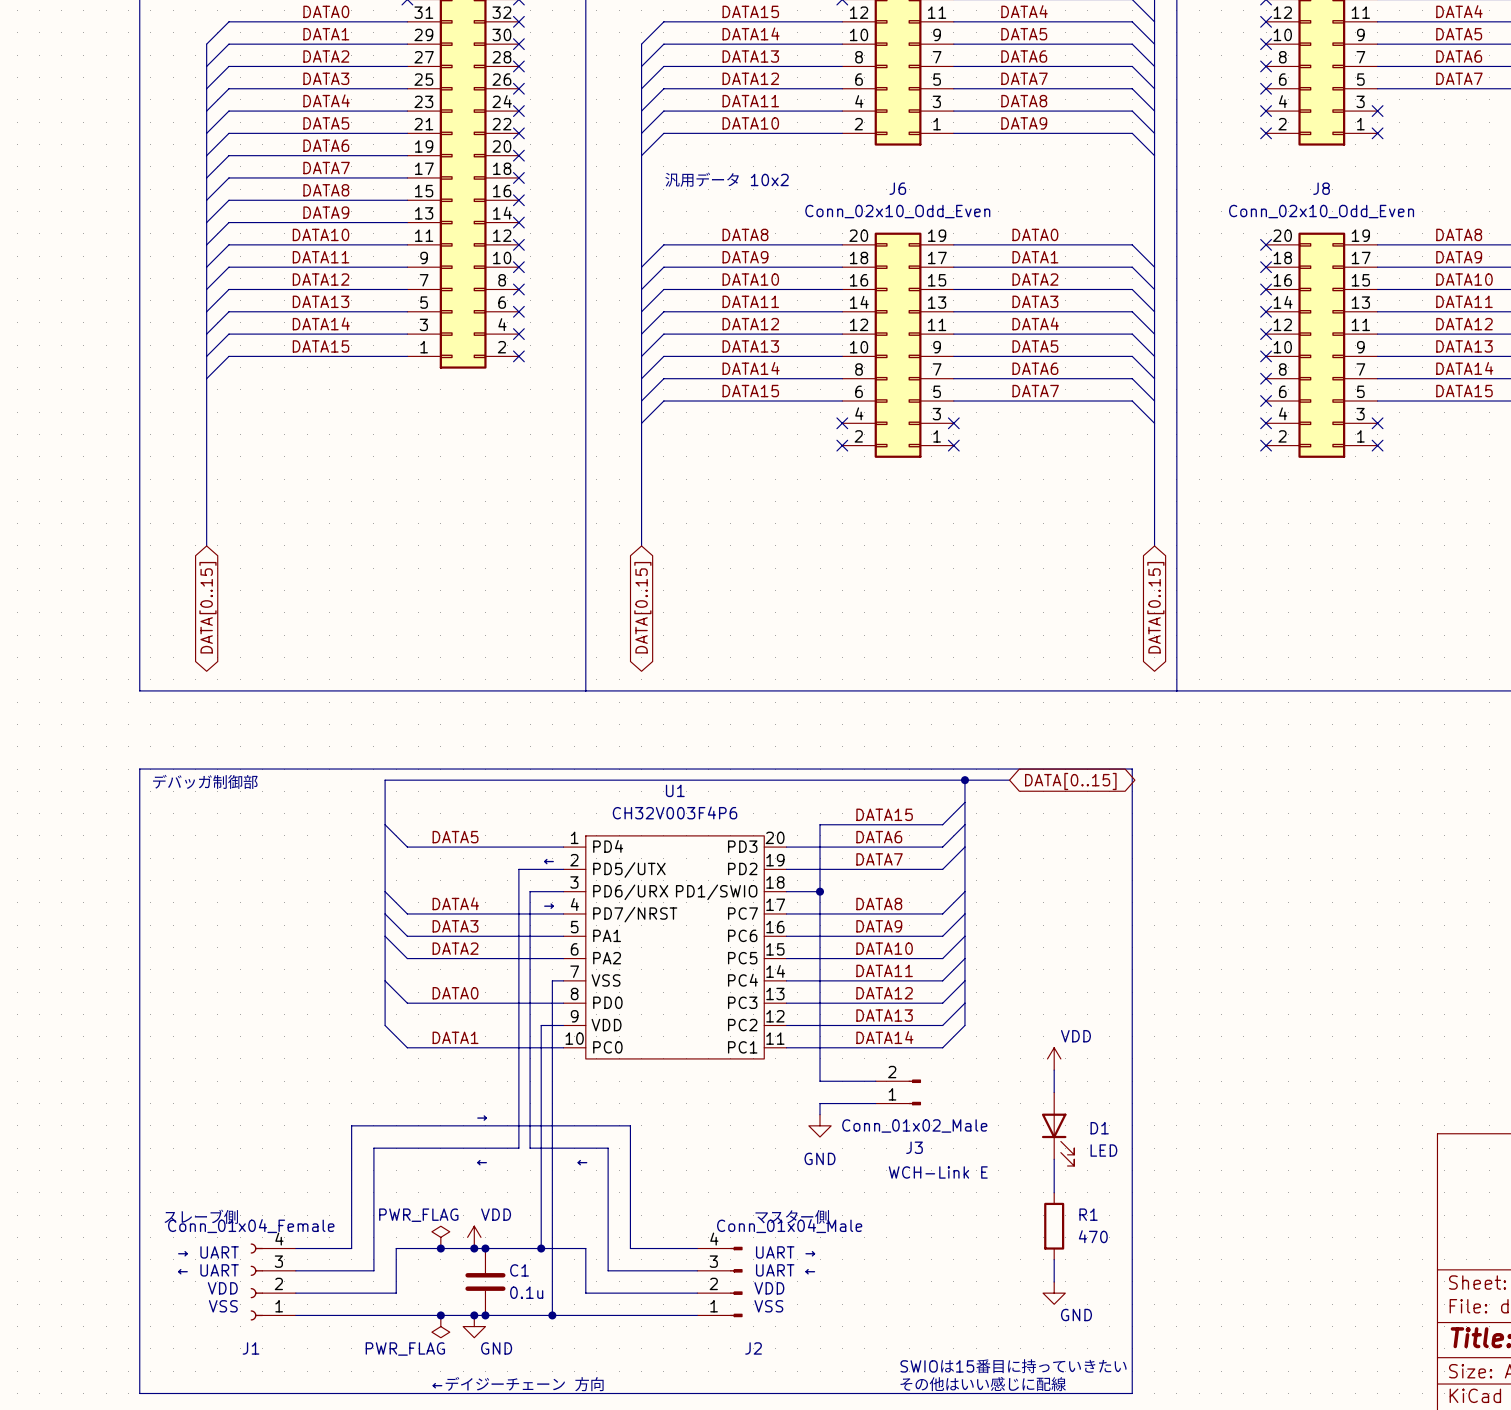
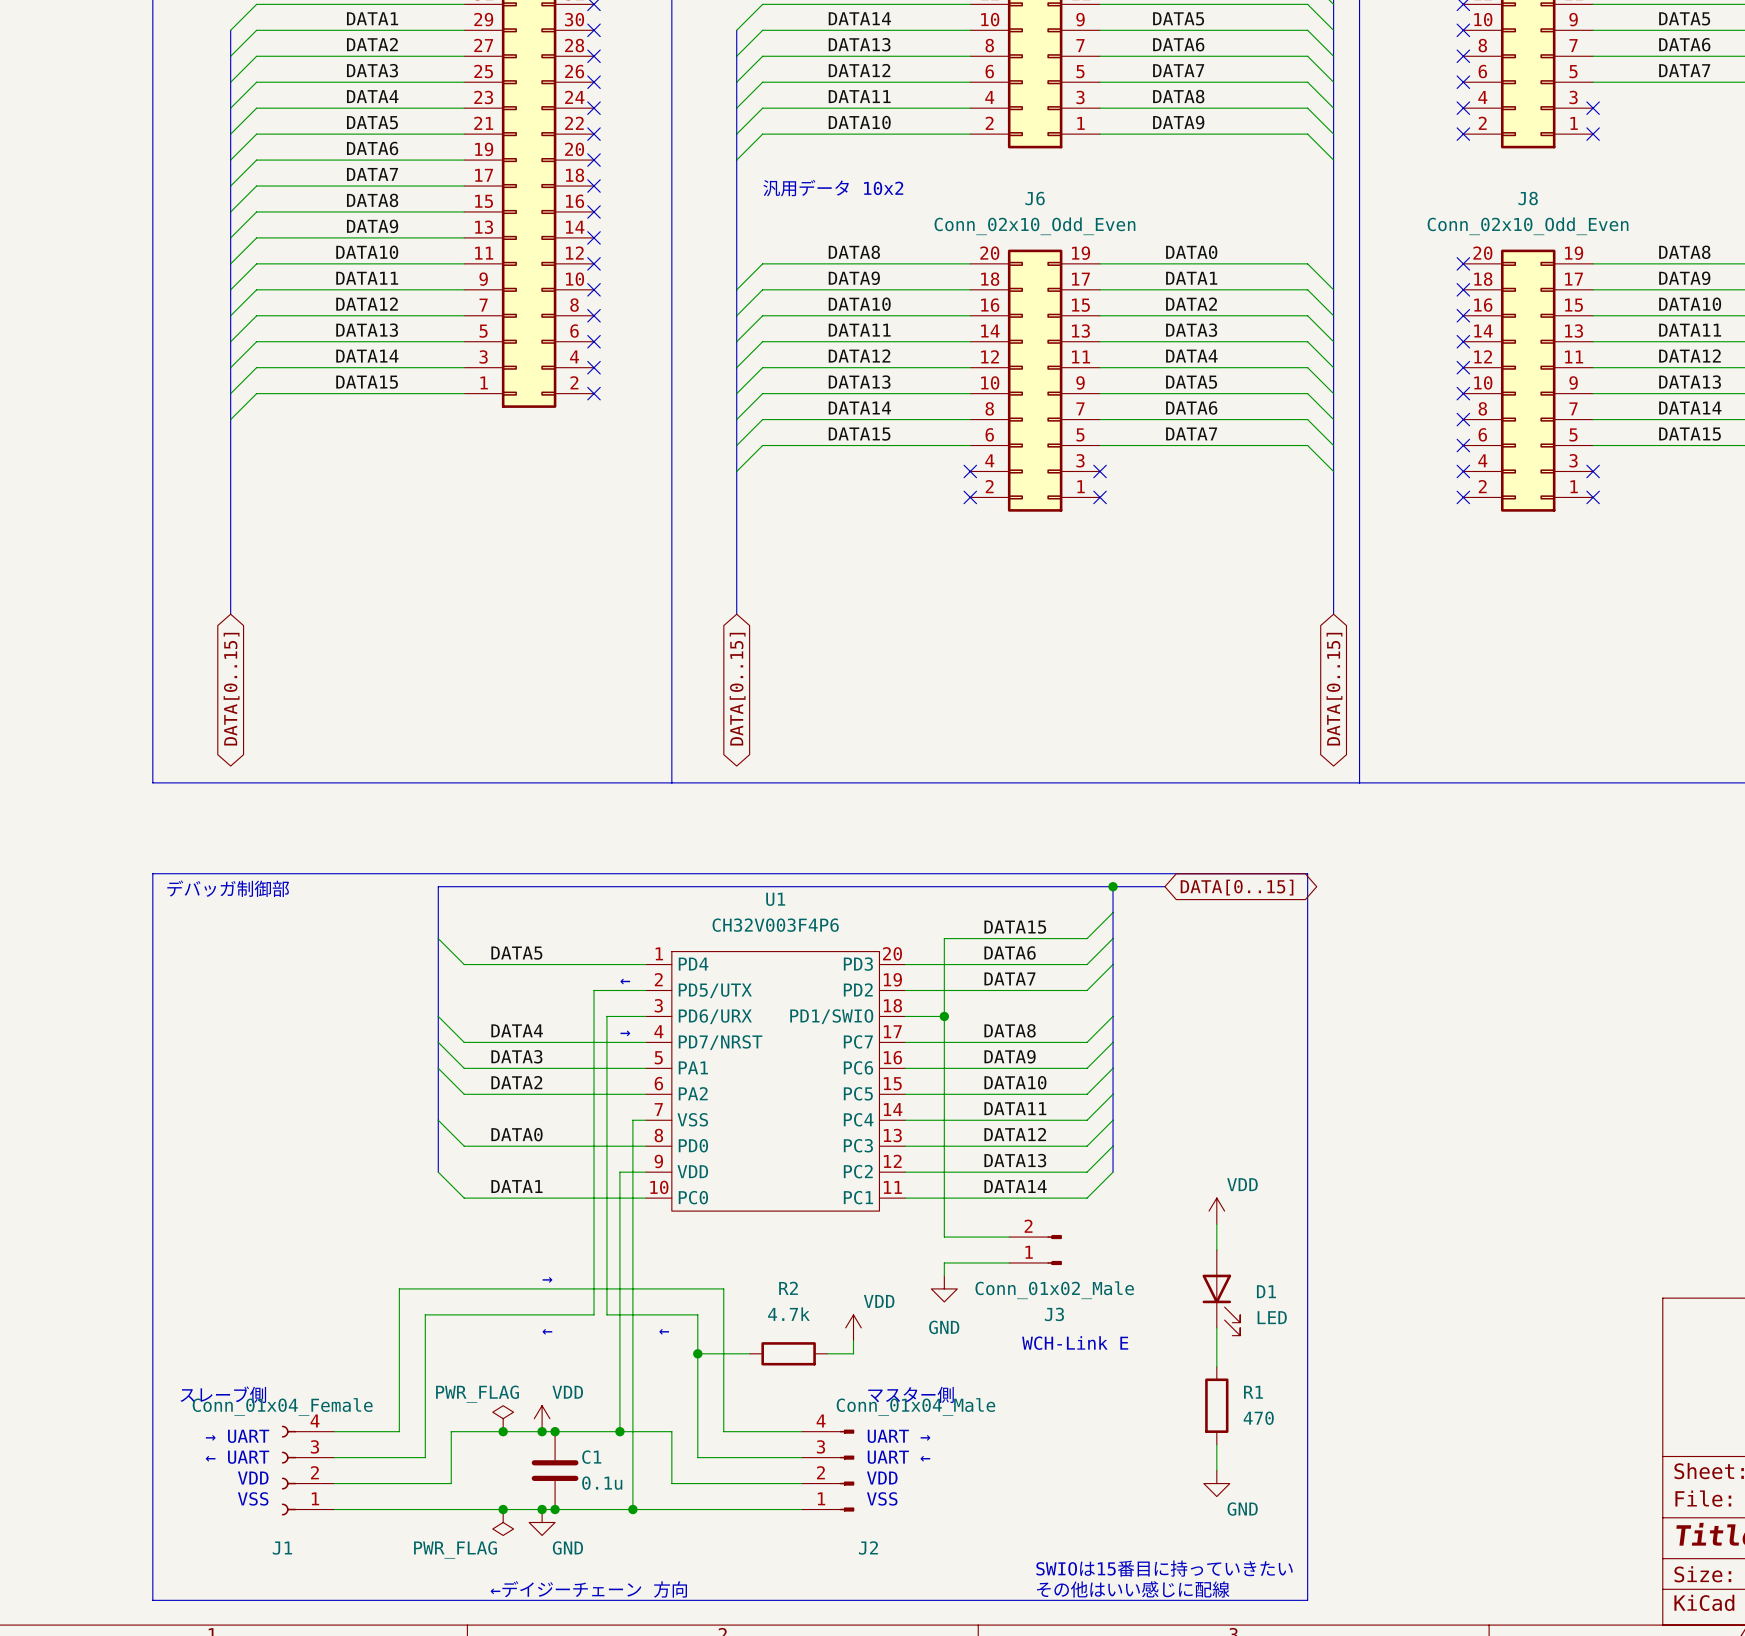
power symbol: none -> VDD (853, 1327)
wire: none -> (853, 1340) (853, 1353) (827, 1353)
wire: none -> (697, 1353) (749, 1353)
junction: none -> (697, 1353)
R2: none -> 4.7k (788, 1353)

